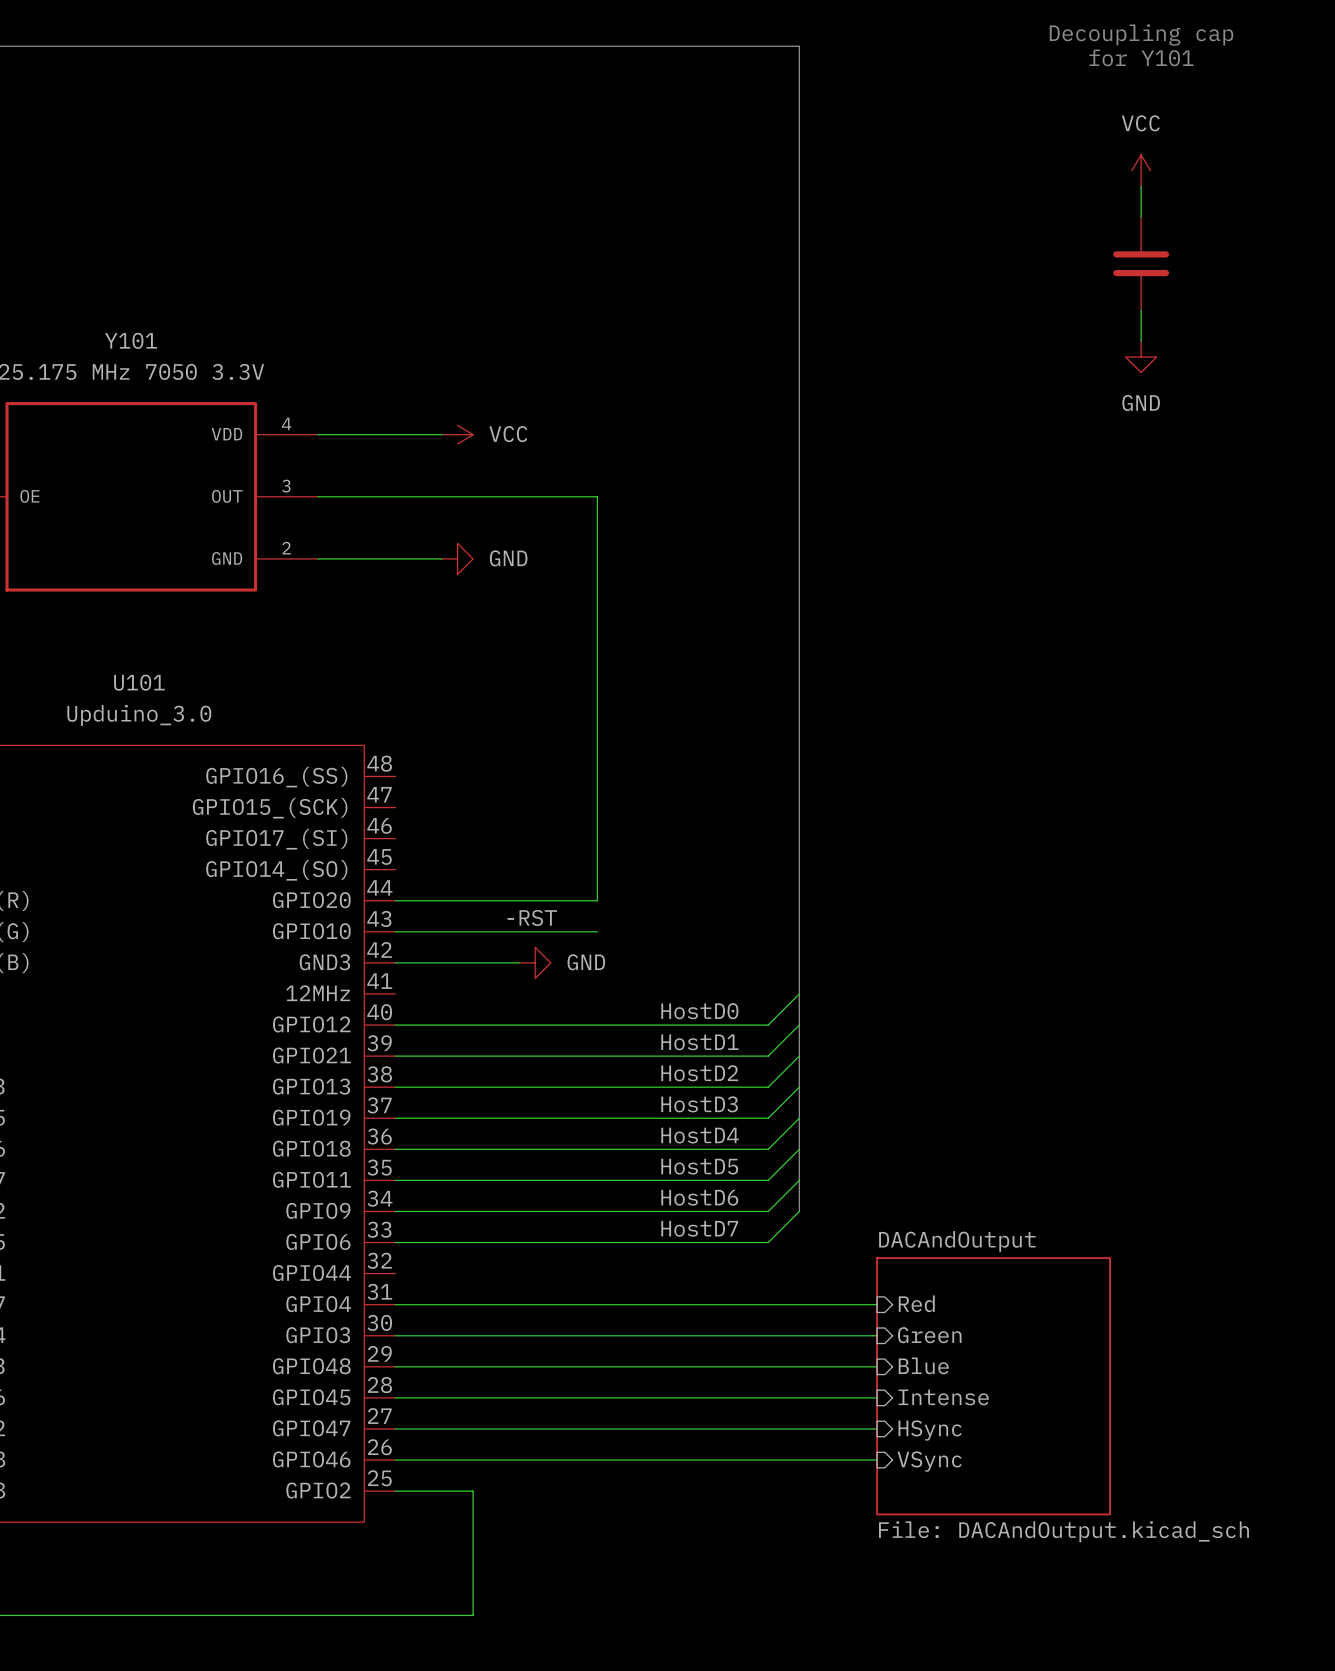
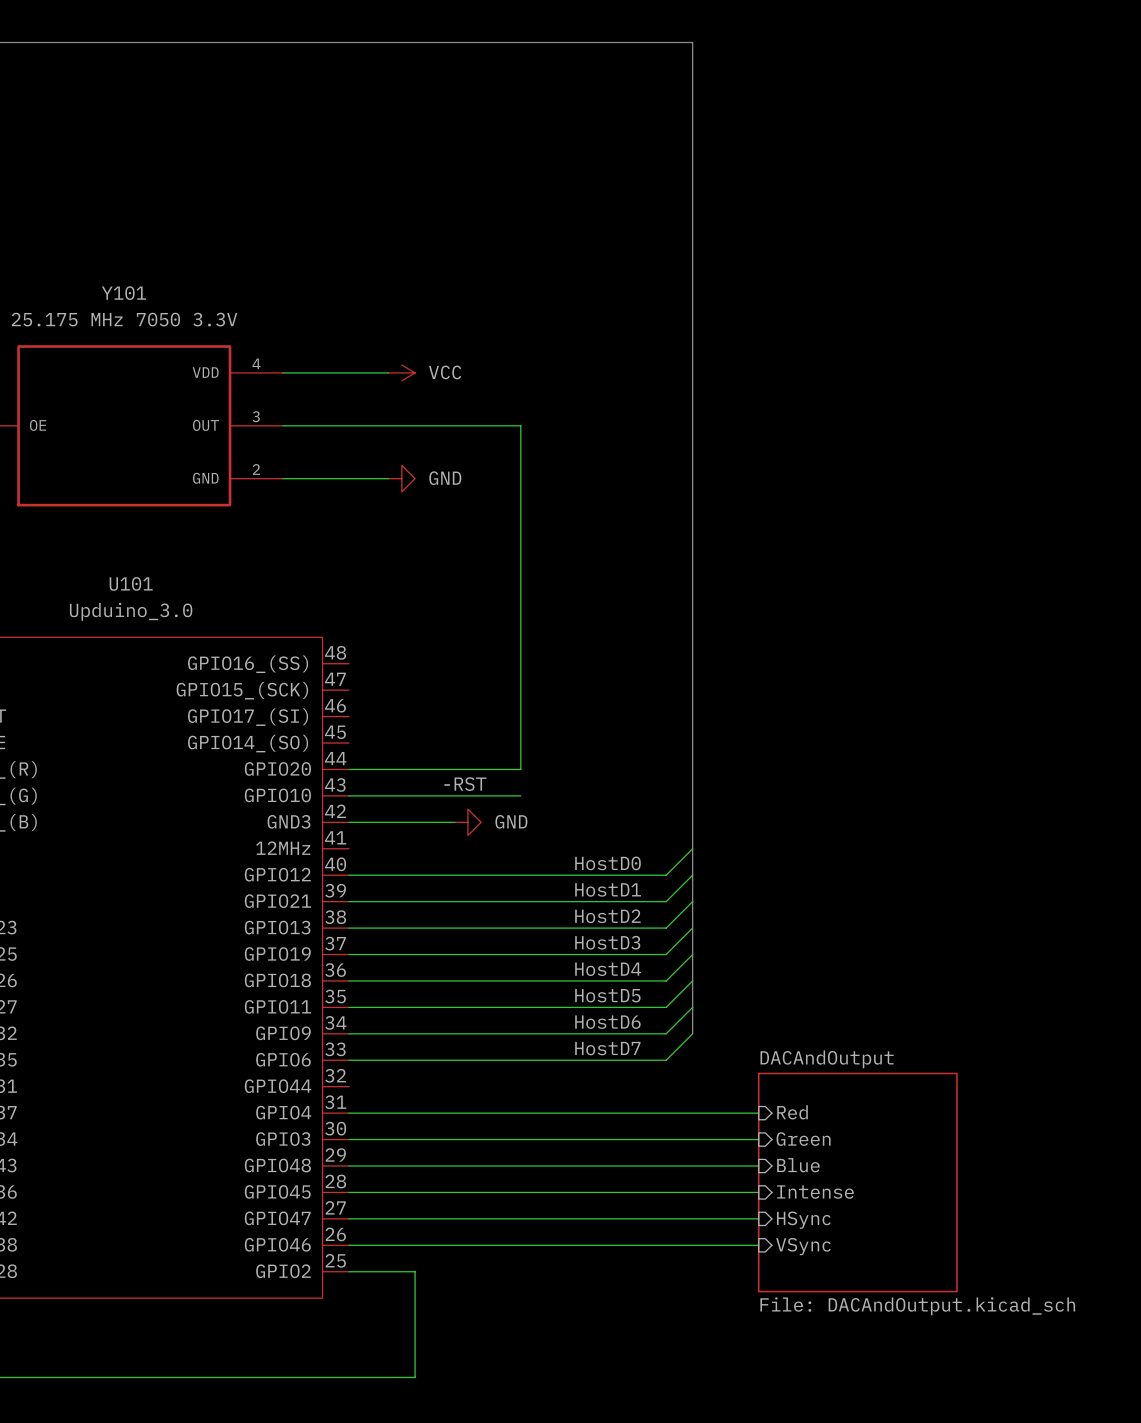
text: Decoupling cap (1141, 35) -> none
text: for Y101 (1141, 57) -> none
power symbol: VCC (1141, 170) -> none
wire: (1141, 186) (1141, 217) -> none
part: (1141, 263) -> none
wire: (1141, 310) (1141, 341) -> none
power symbol: GND (1141, 356) -> none

